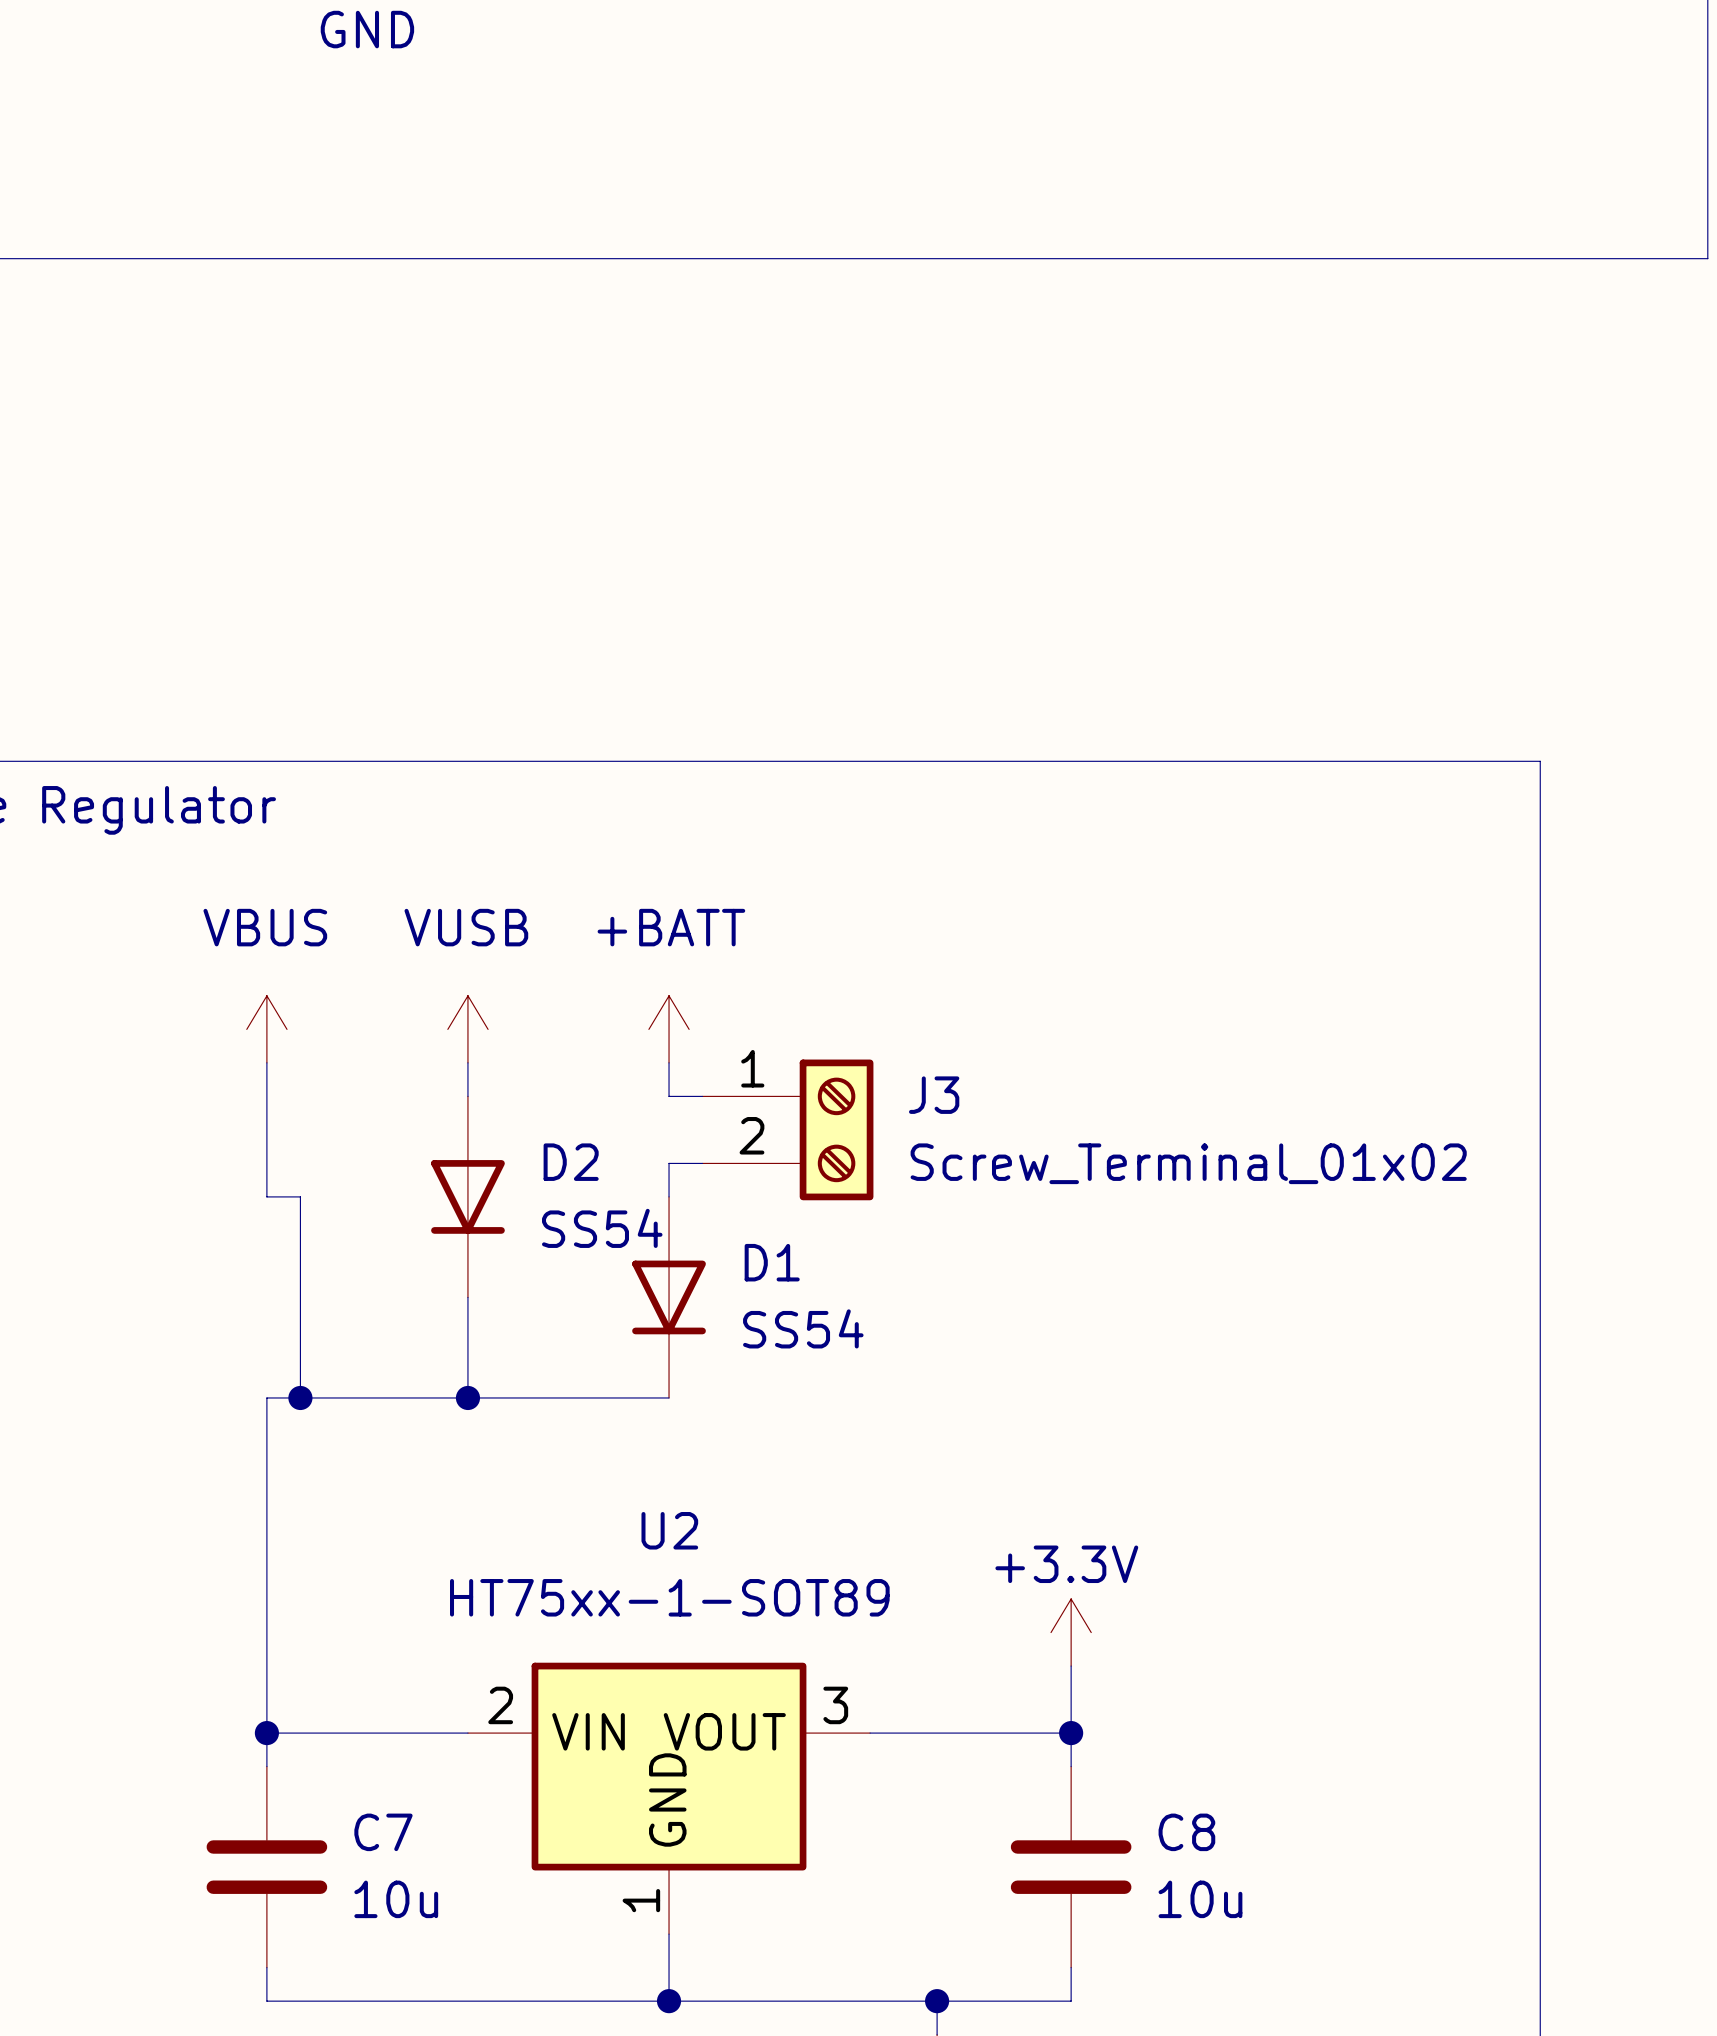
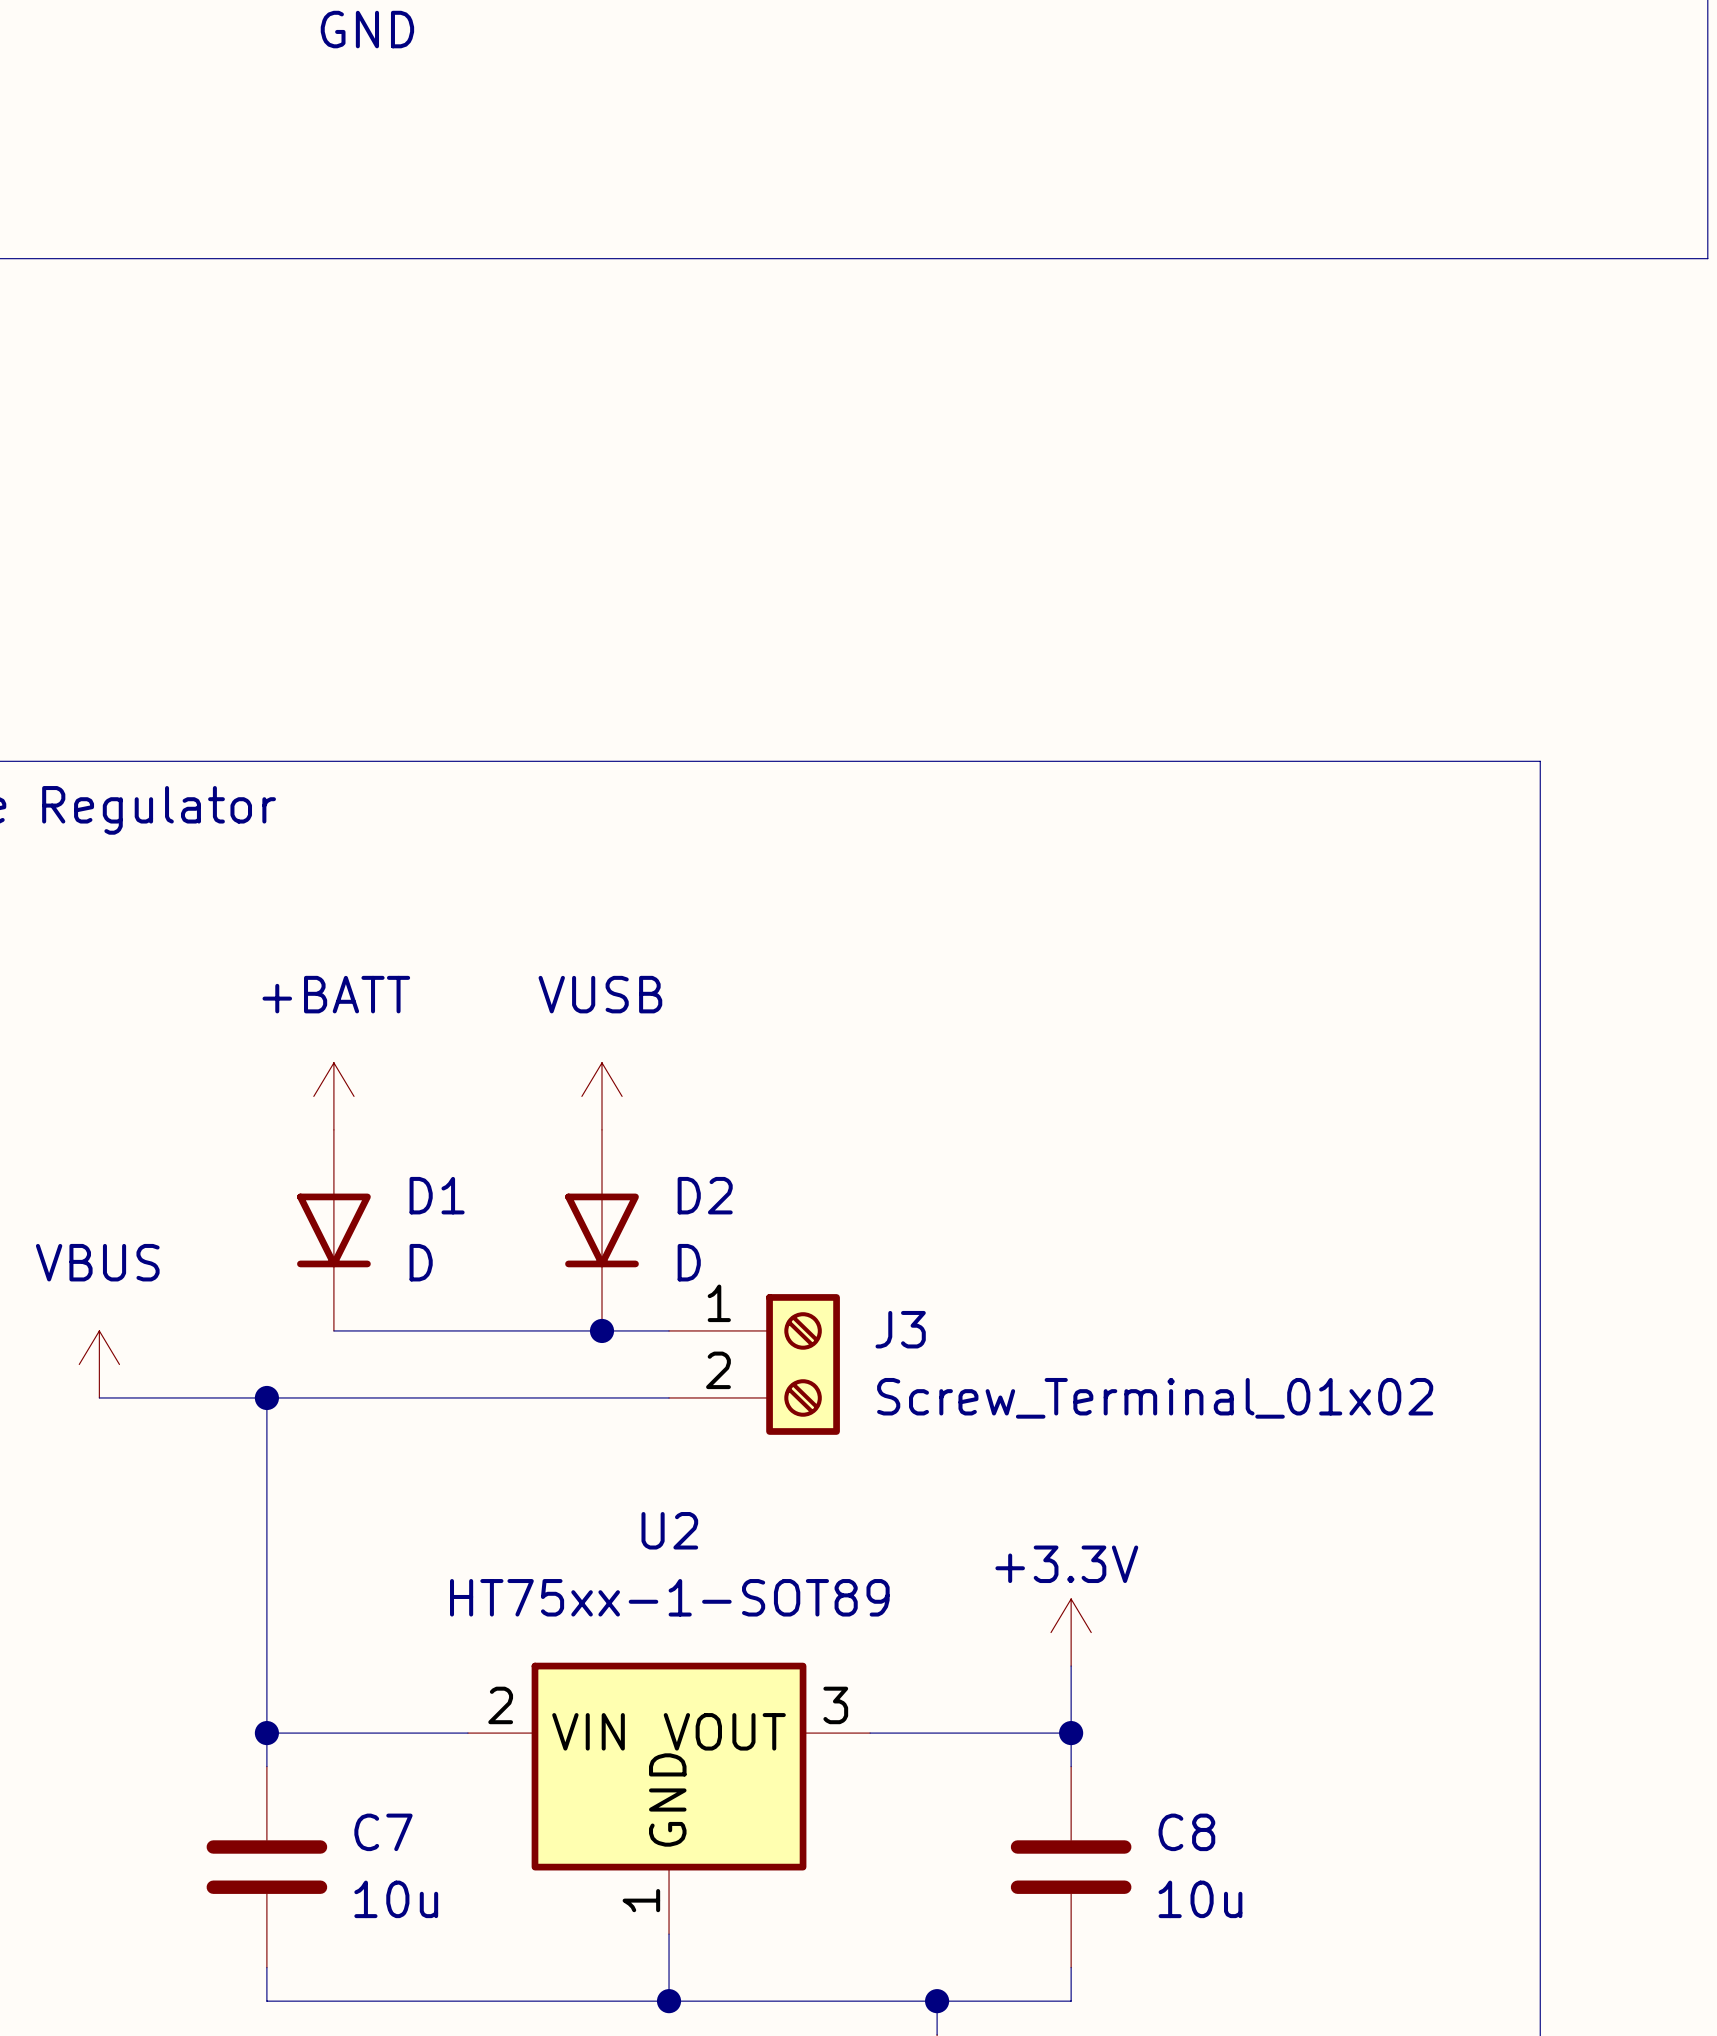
power symbol position: VBUS (266, 1029) -> VBUS (99, 1364)
power symbol position: VUSB (467, 1029) -> VUSB (602, 1096)
power symbol position: +BATT (669, 1029) -> +BATT (333, 1096)
wire: (266, 1062) (266, 1196) (300, 1196) (300, 1397) -> none
wire: (467, 1062) (467, 1096) -> none
wire: (669, 1062) (669, 1096) (702, 1096) -> none
J3 position: (787, 1129) -> (754, 1364)
wire: (702, 1163) (669, 1163) (669, 1196) -> none
D2 position: (467, 1196) -> (602, 1230)
D2 value: SS54 (602, 1228) -> D (689, 1262)
wire: (467, 1297) (467, 1397) -> none
D1 position: (669, 1297) -> (333, 1230)
D1 value: SS54 (803, 1328) -> D (421, 1262)
wire: none -> (333, 1330) (669, 1330)
junction: none -> (602, 1330)
wire: none -> (99, 1397) (266, 1397)
junction position: (300, 1397) -> (266, 1397)
junction: (467, 1397) -> none

